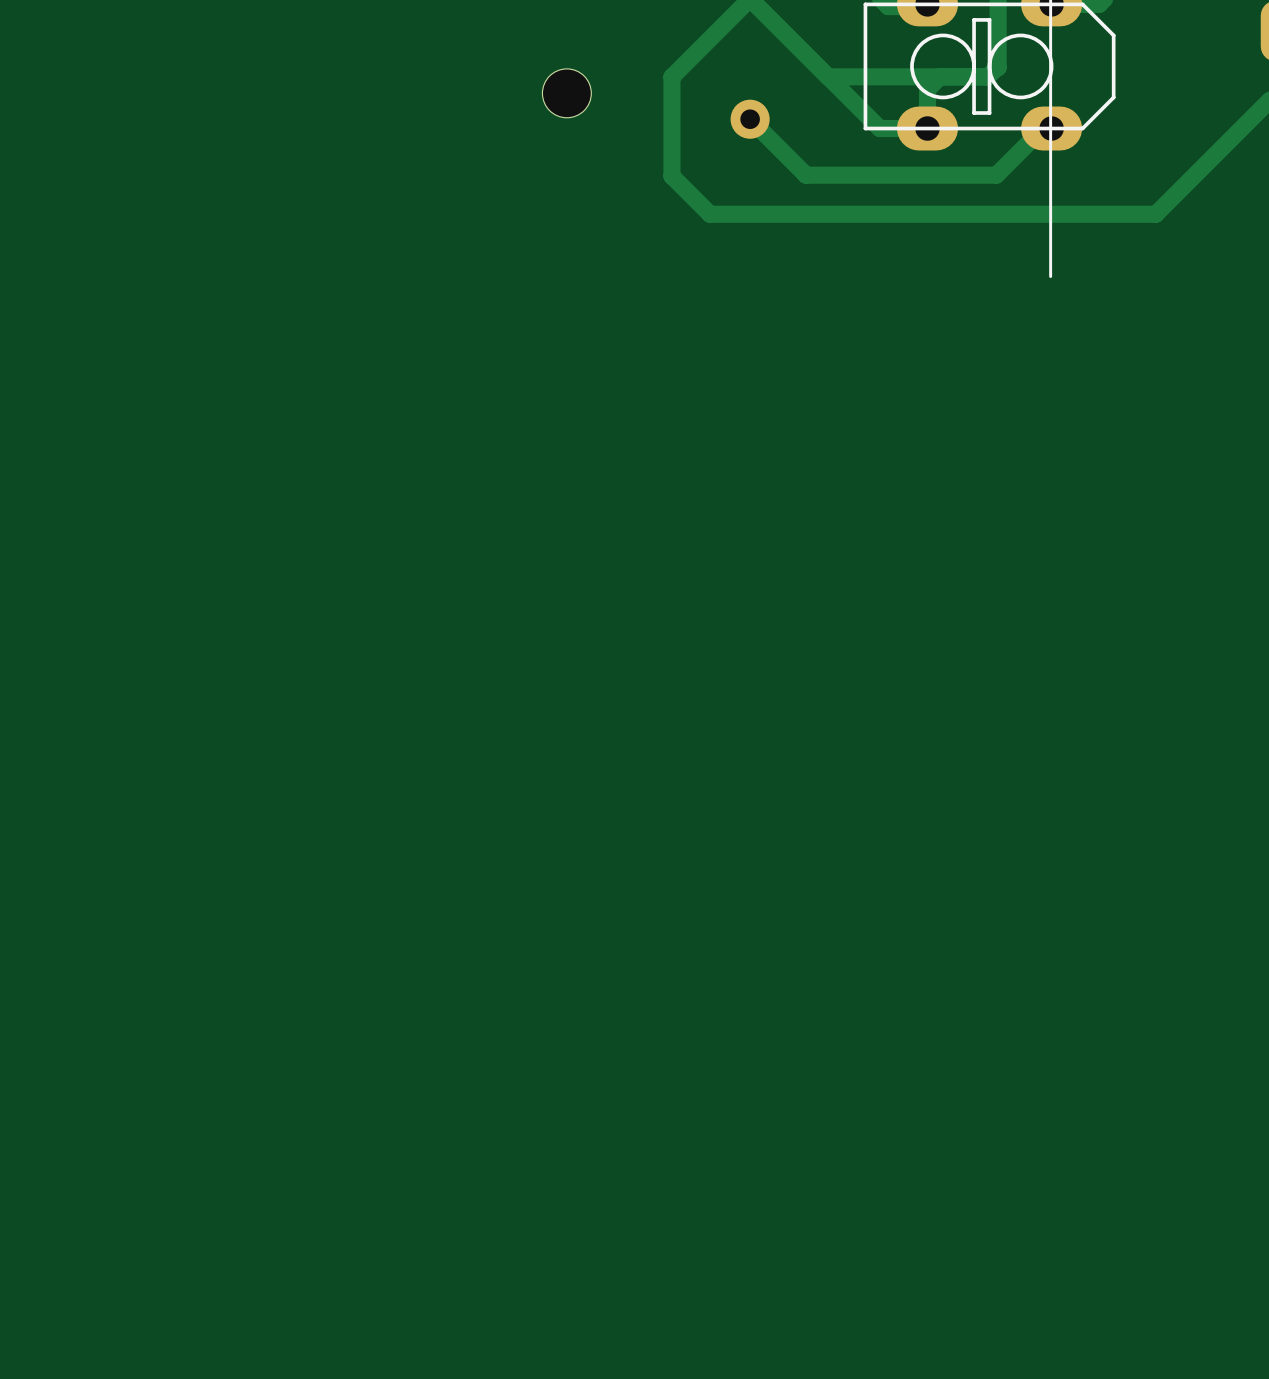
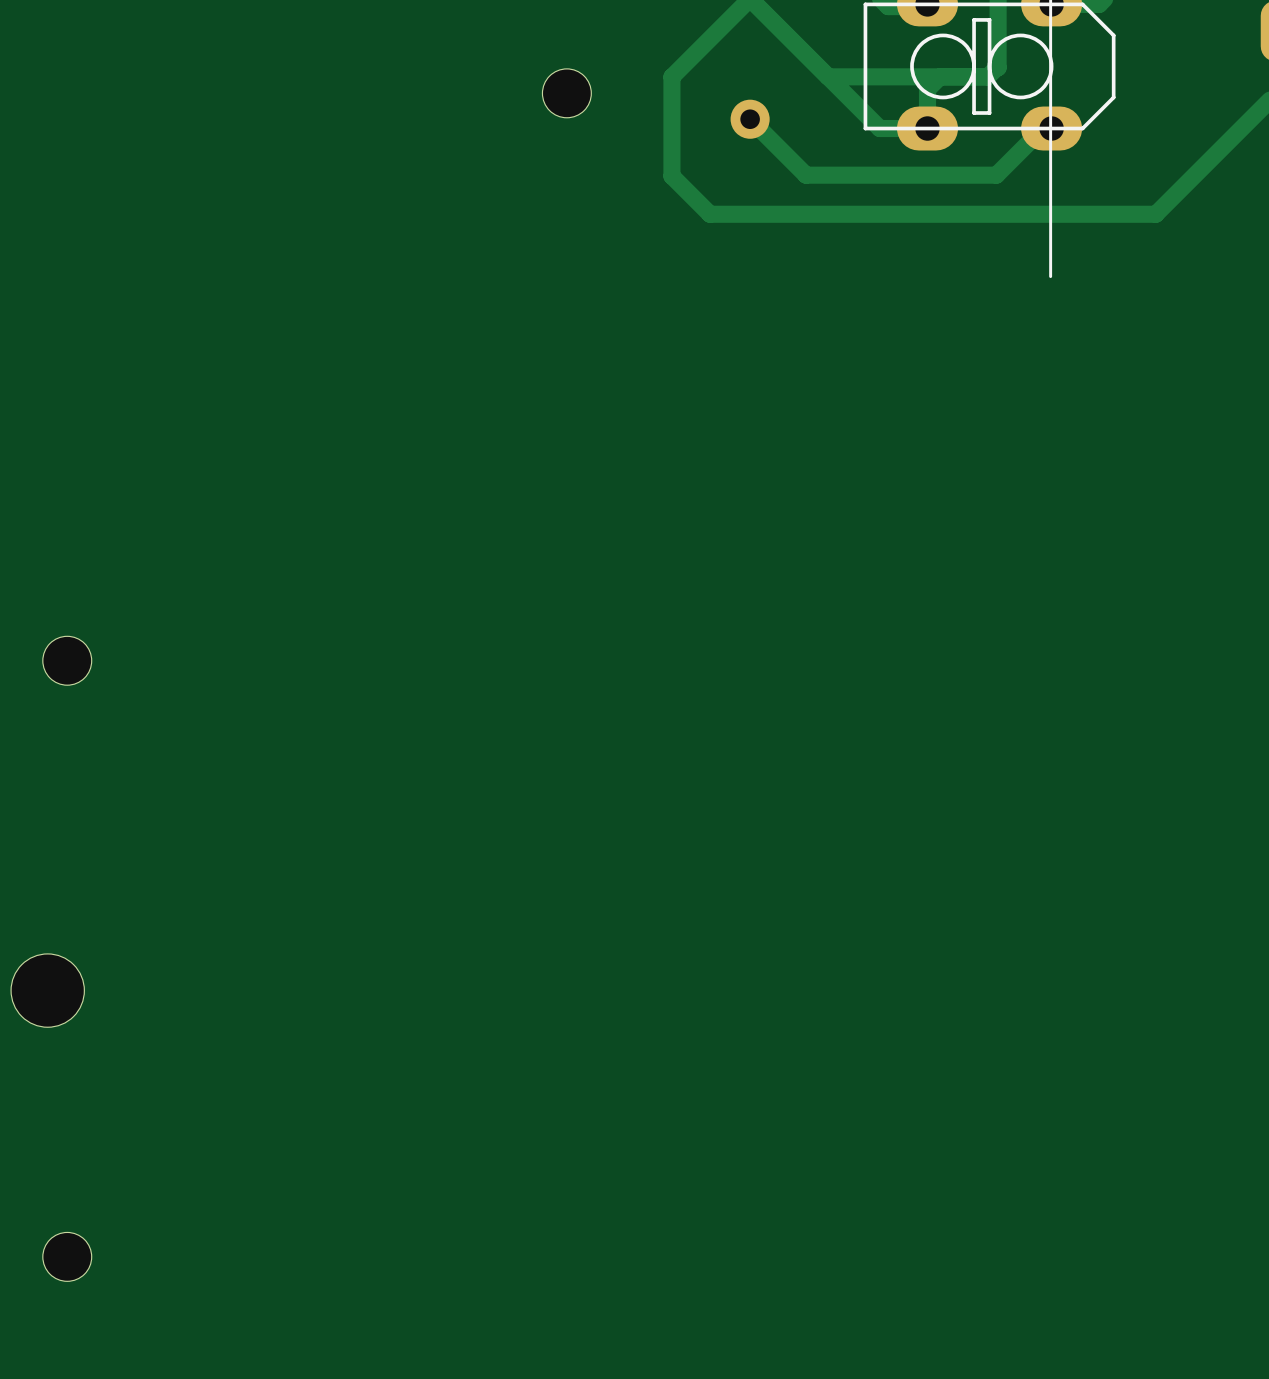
part: none -> (67, 660)
part: none -> (47, 990)
part: none -> (67, 1256)

